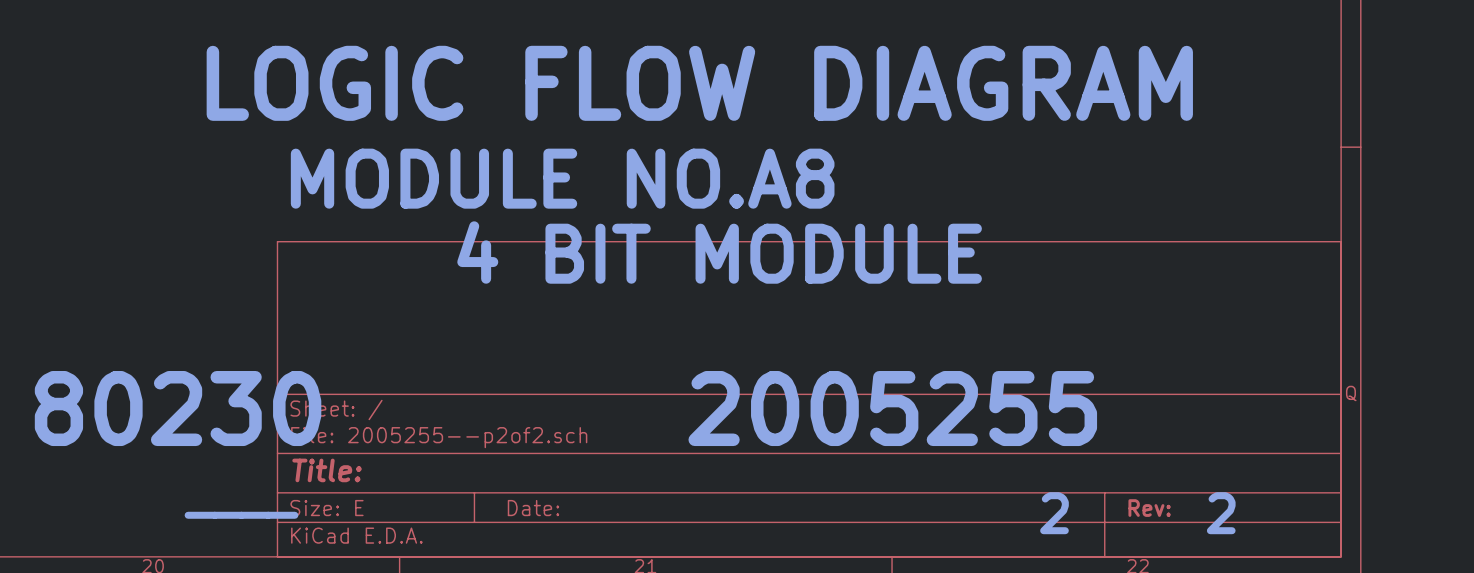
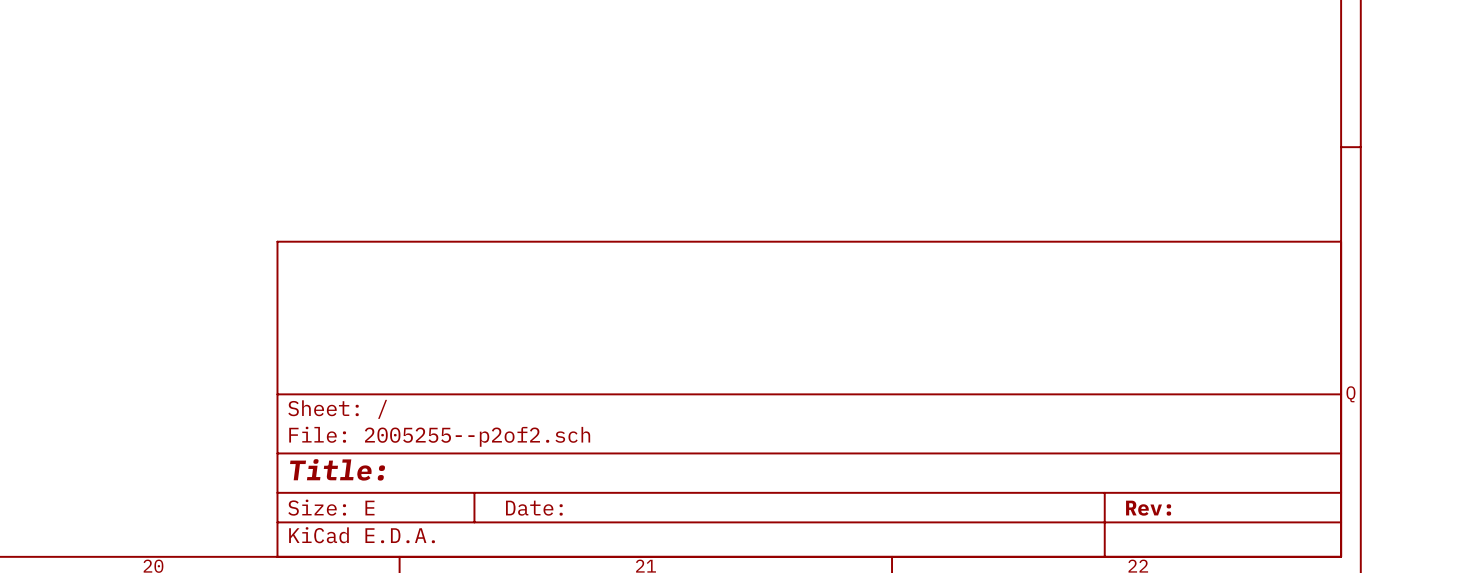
text: LOGIC FLOW DIAGRAM (699, 83) -> none
text: MODULE NO.A8 (562, 178) -> none
text: 4 BIT MODULE (719, 252) -> none
text: 80230 (178, 408) -> none
text: 2005255 (892, 408) -> none
text: 2 2 (1137, 513) -> none
text: ____ (241, 515) -> none

